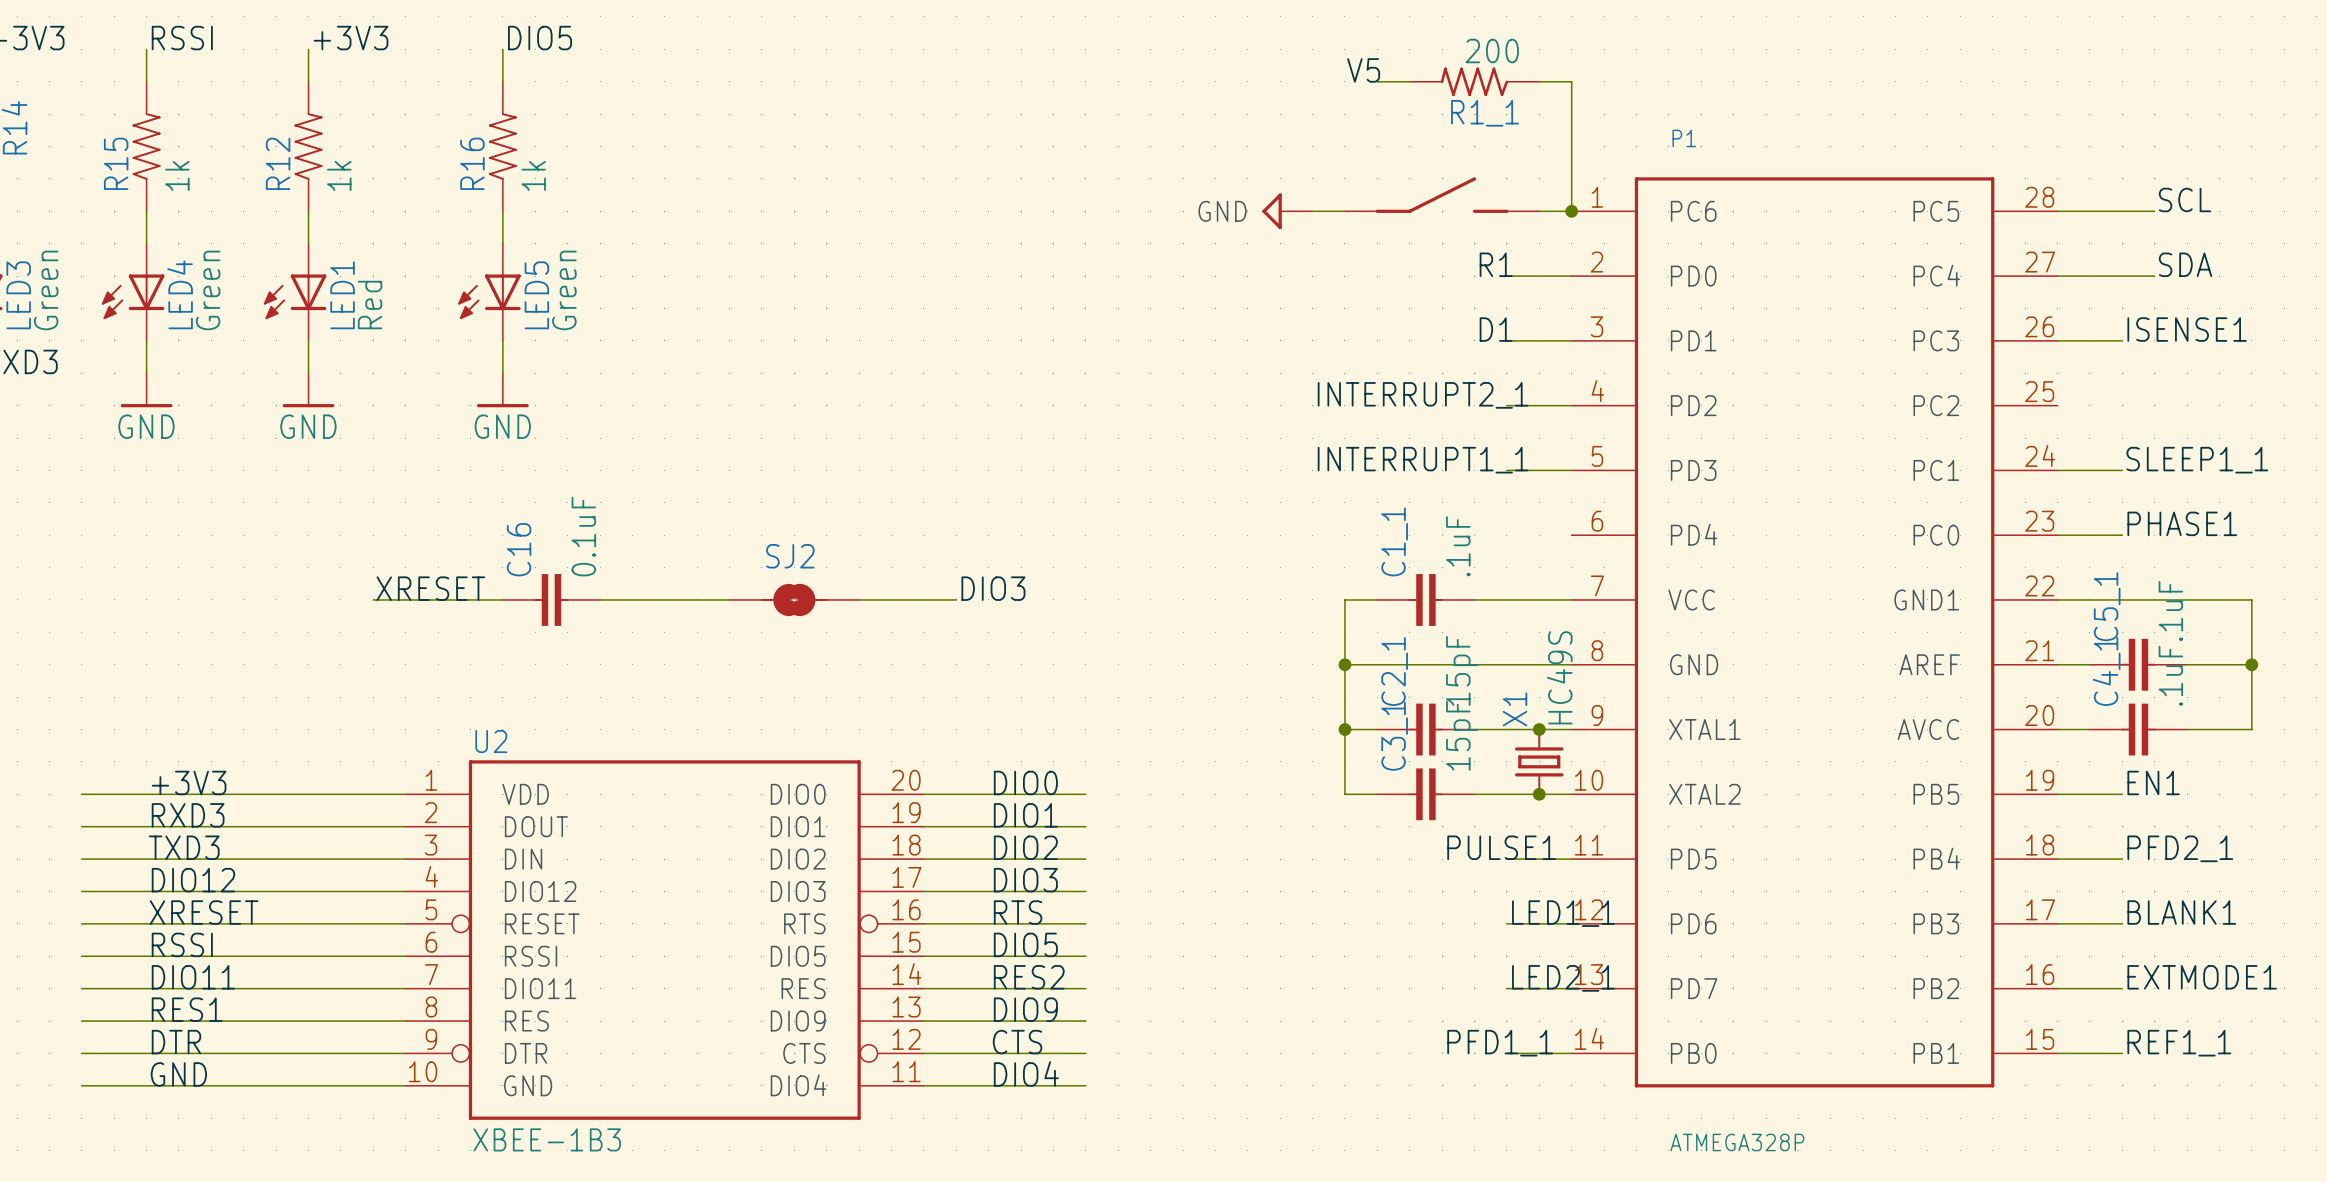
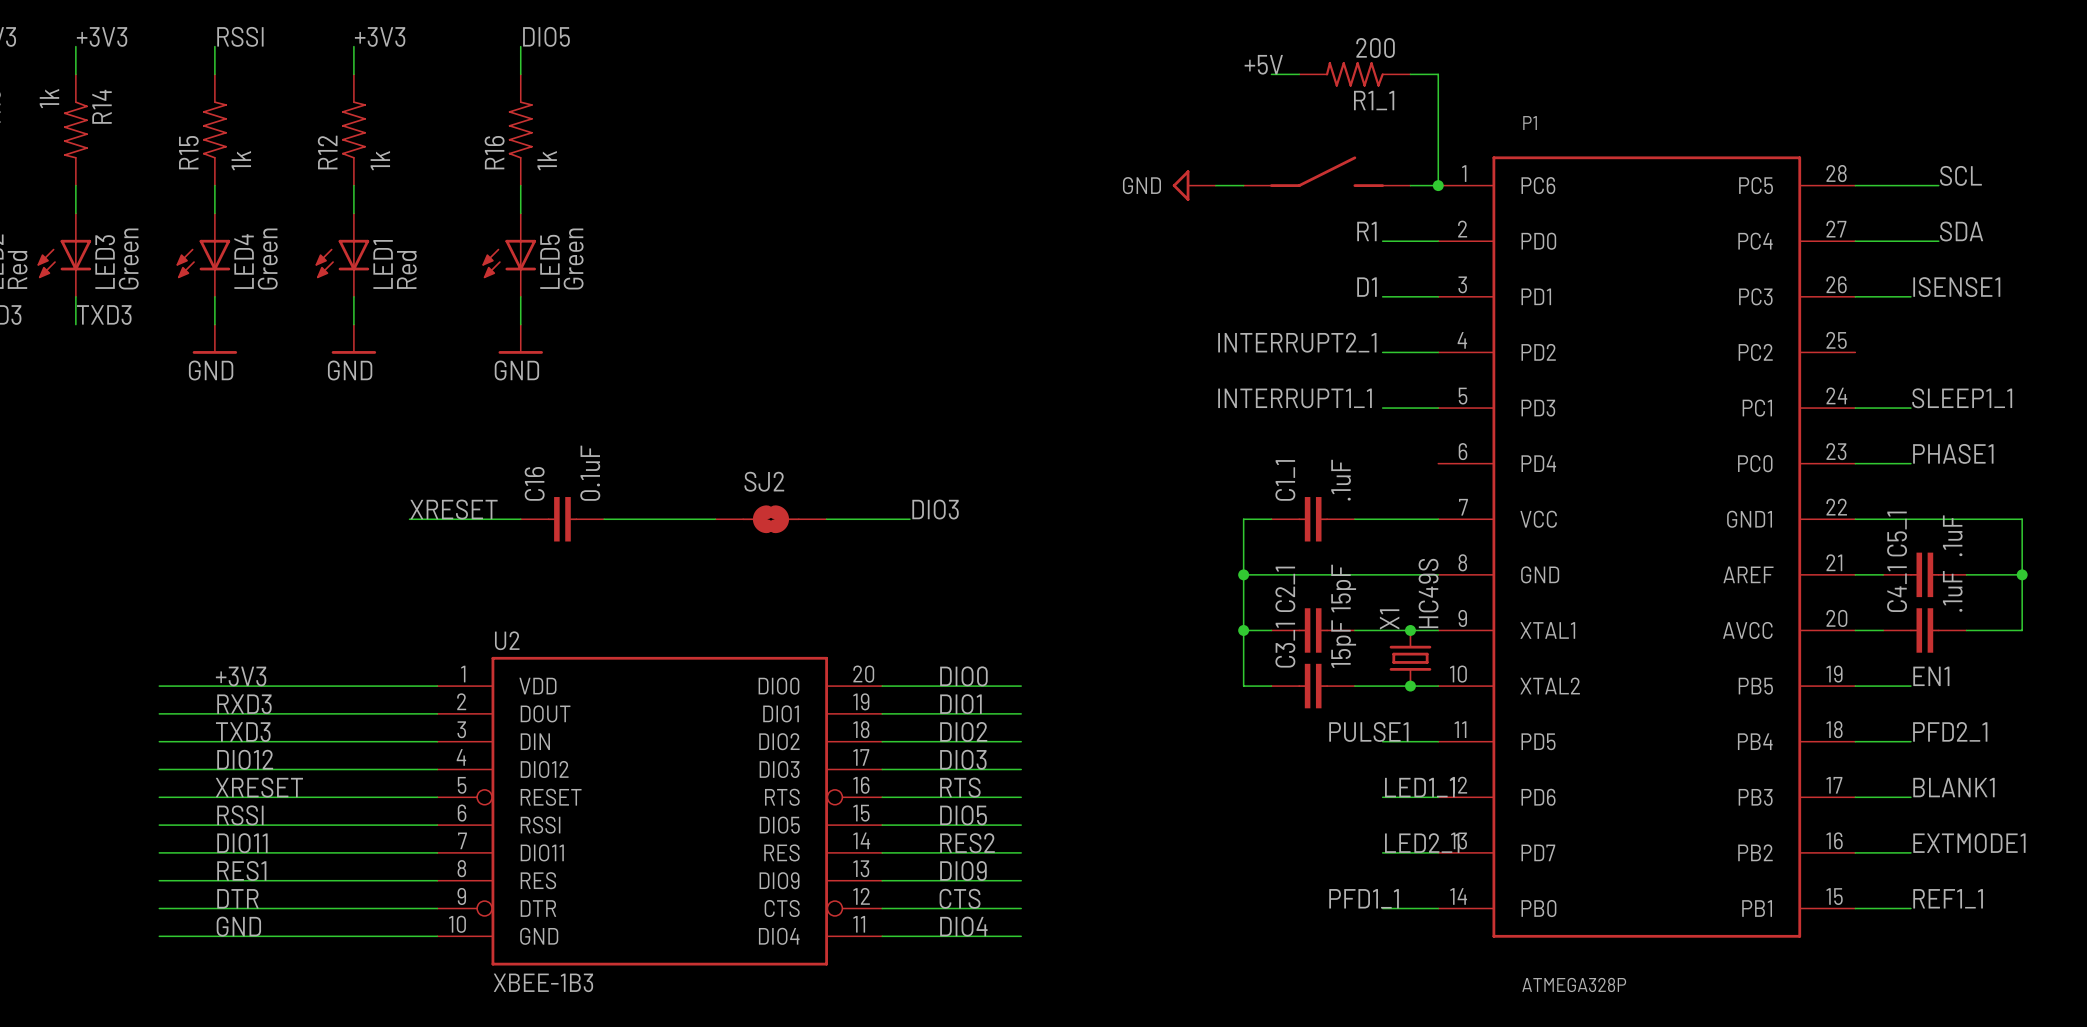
label: V5 (1363, 70) -> +5V (1263, 64)

